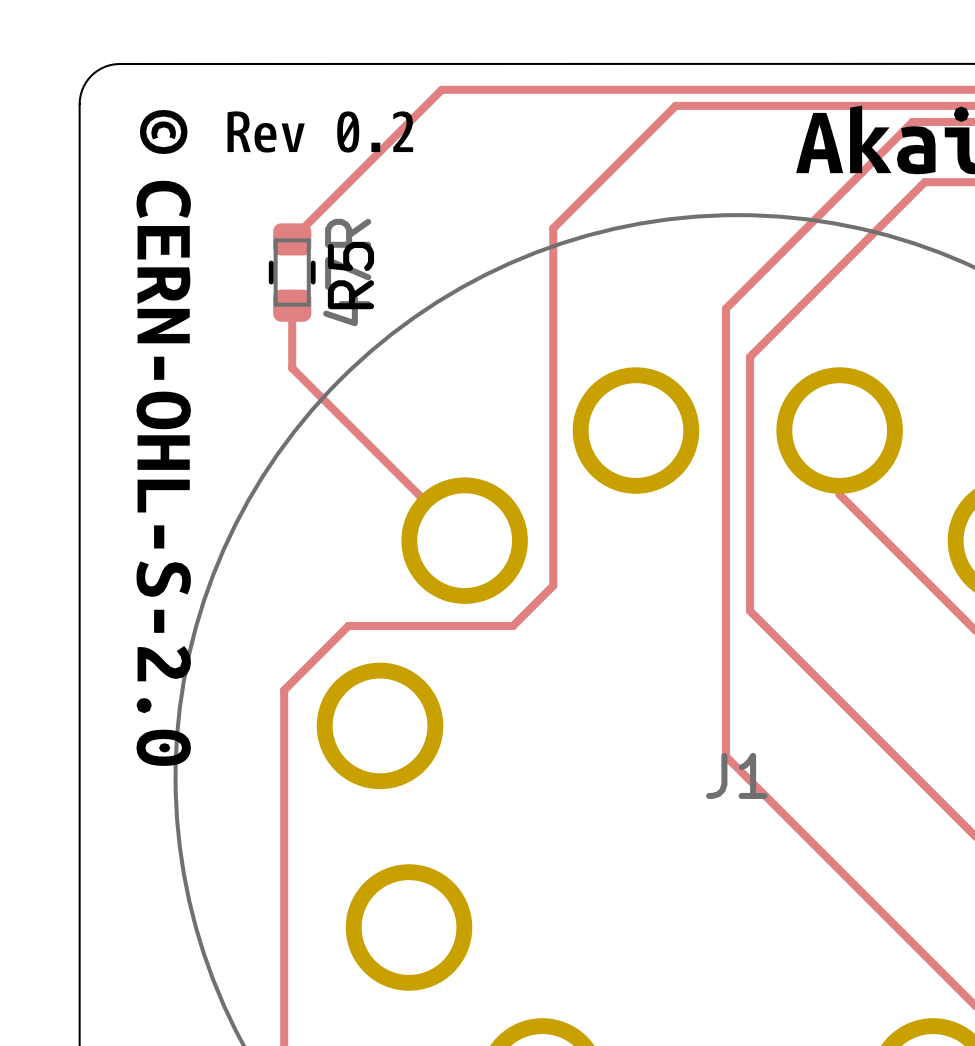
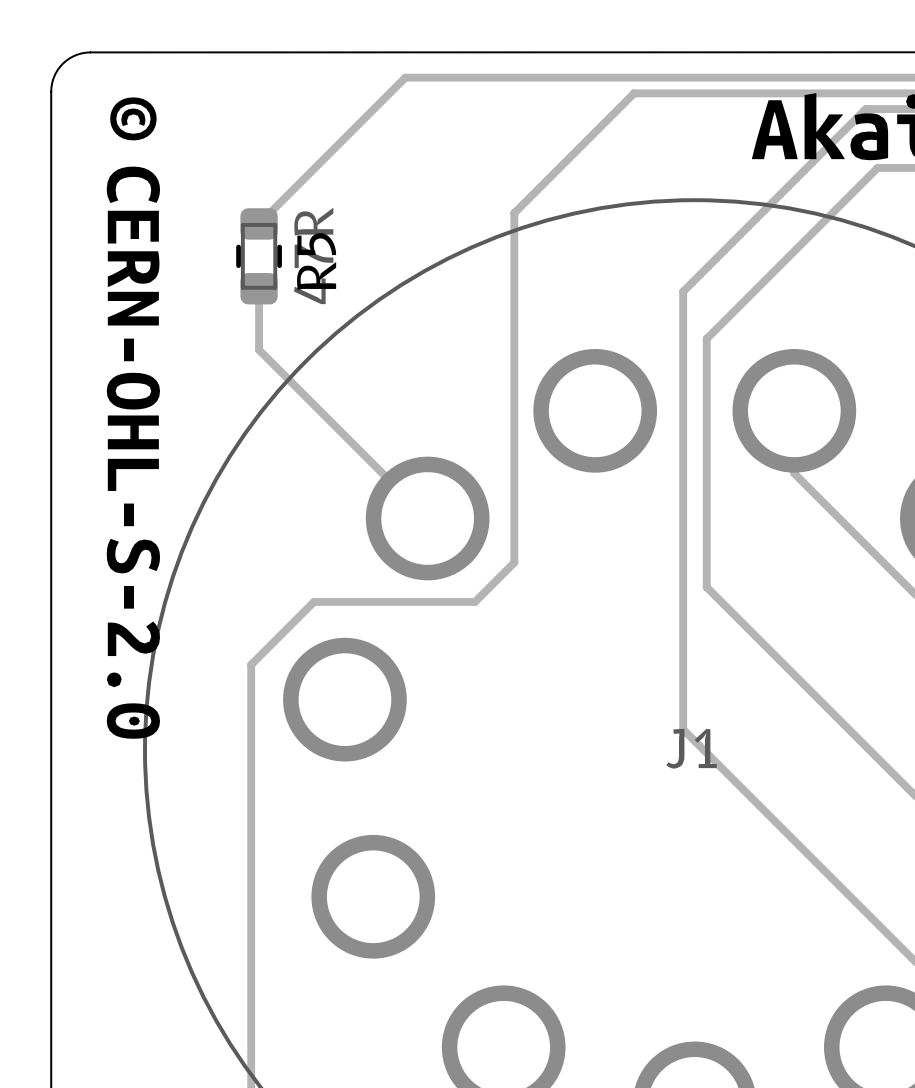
drawing: [227, 111, 414, 153] -> none

